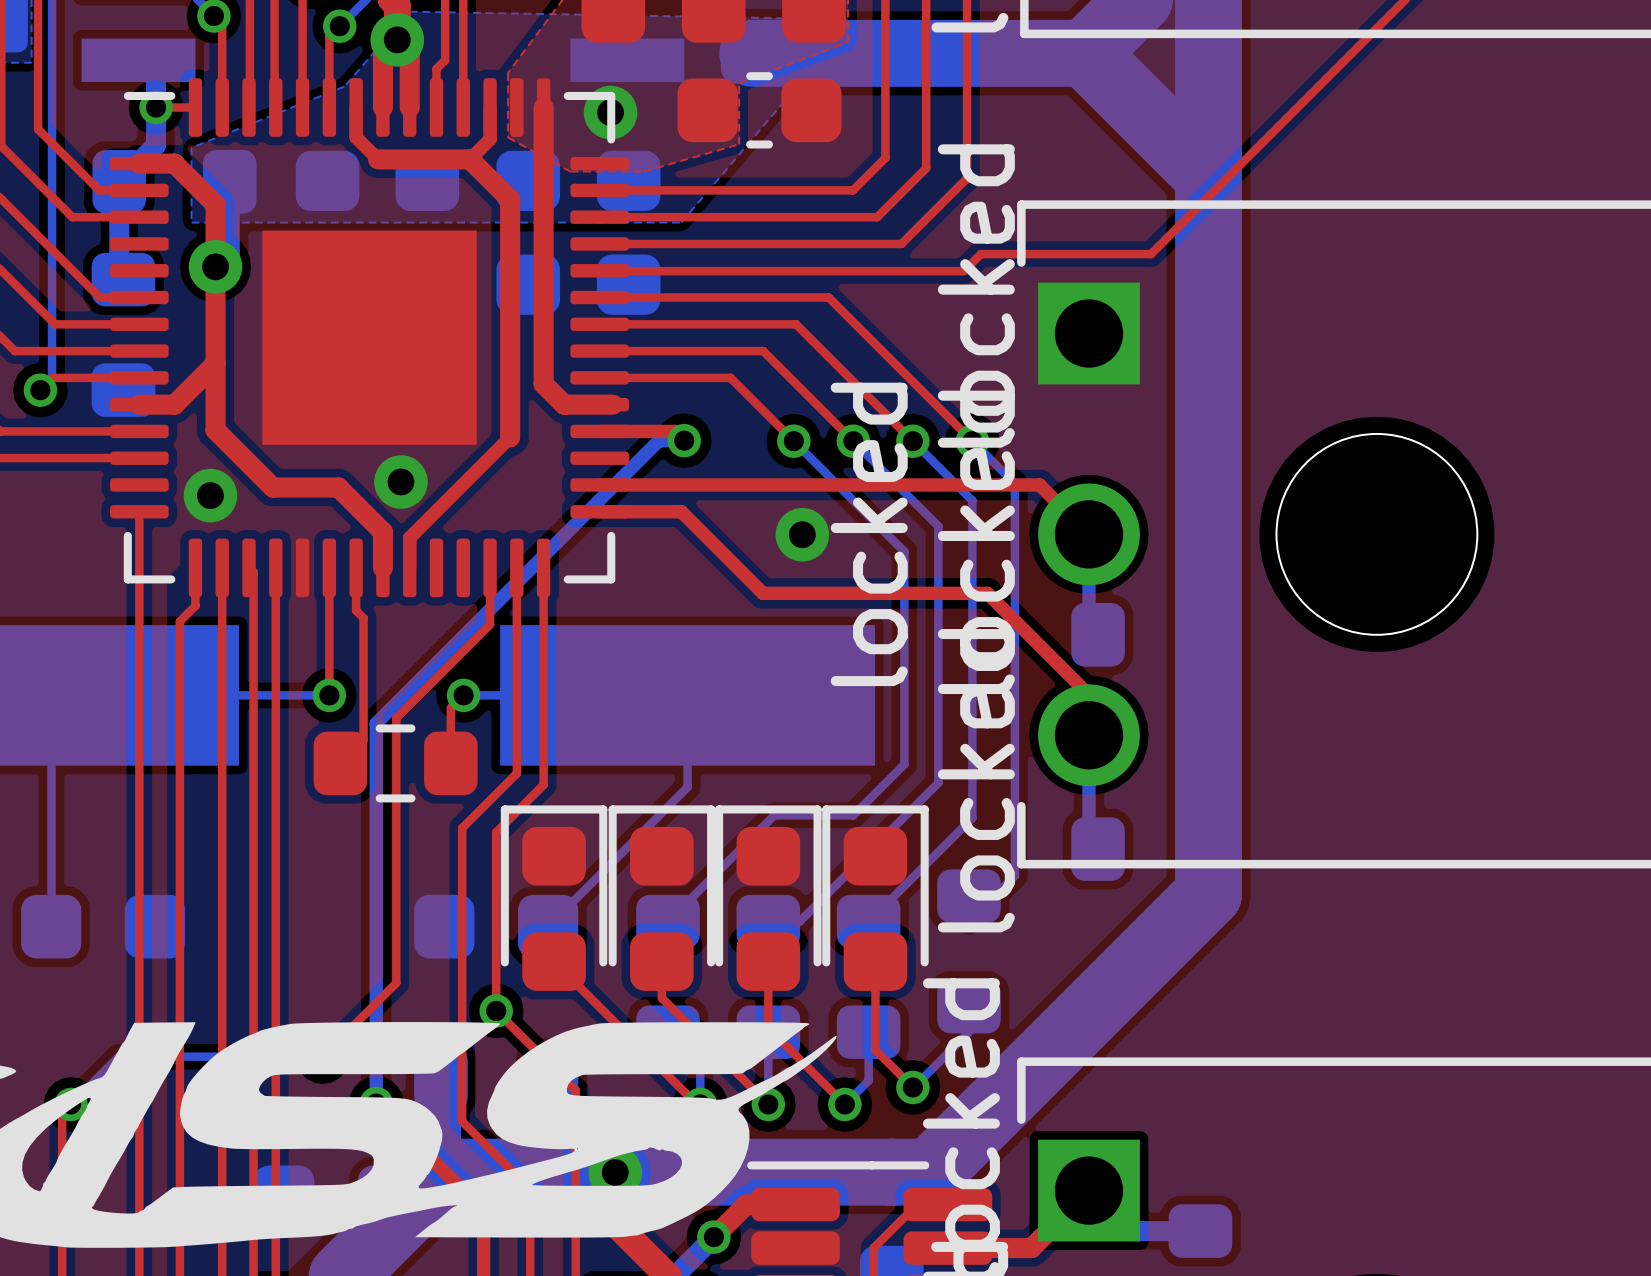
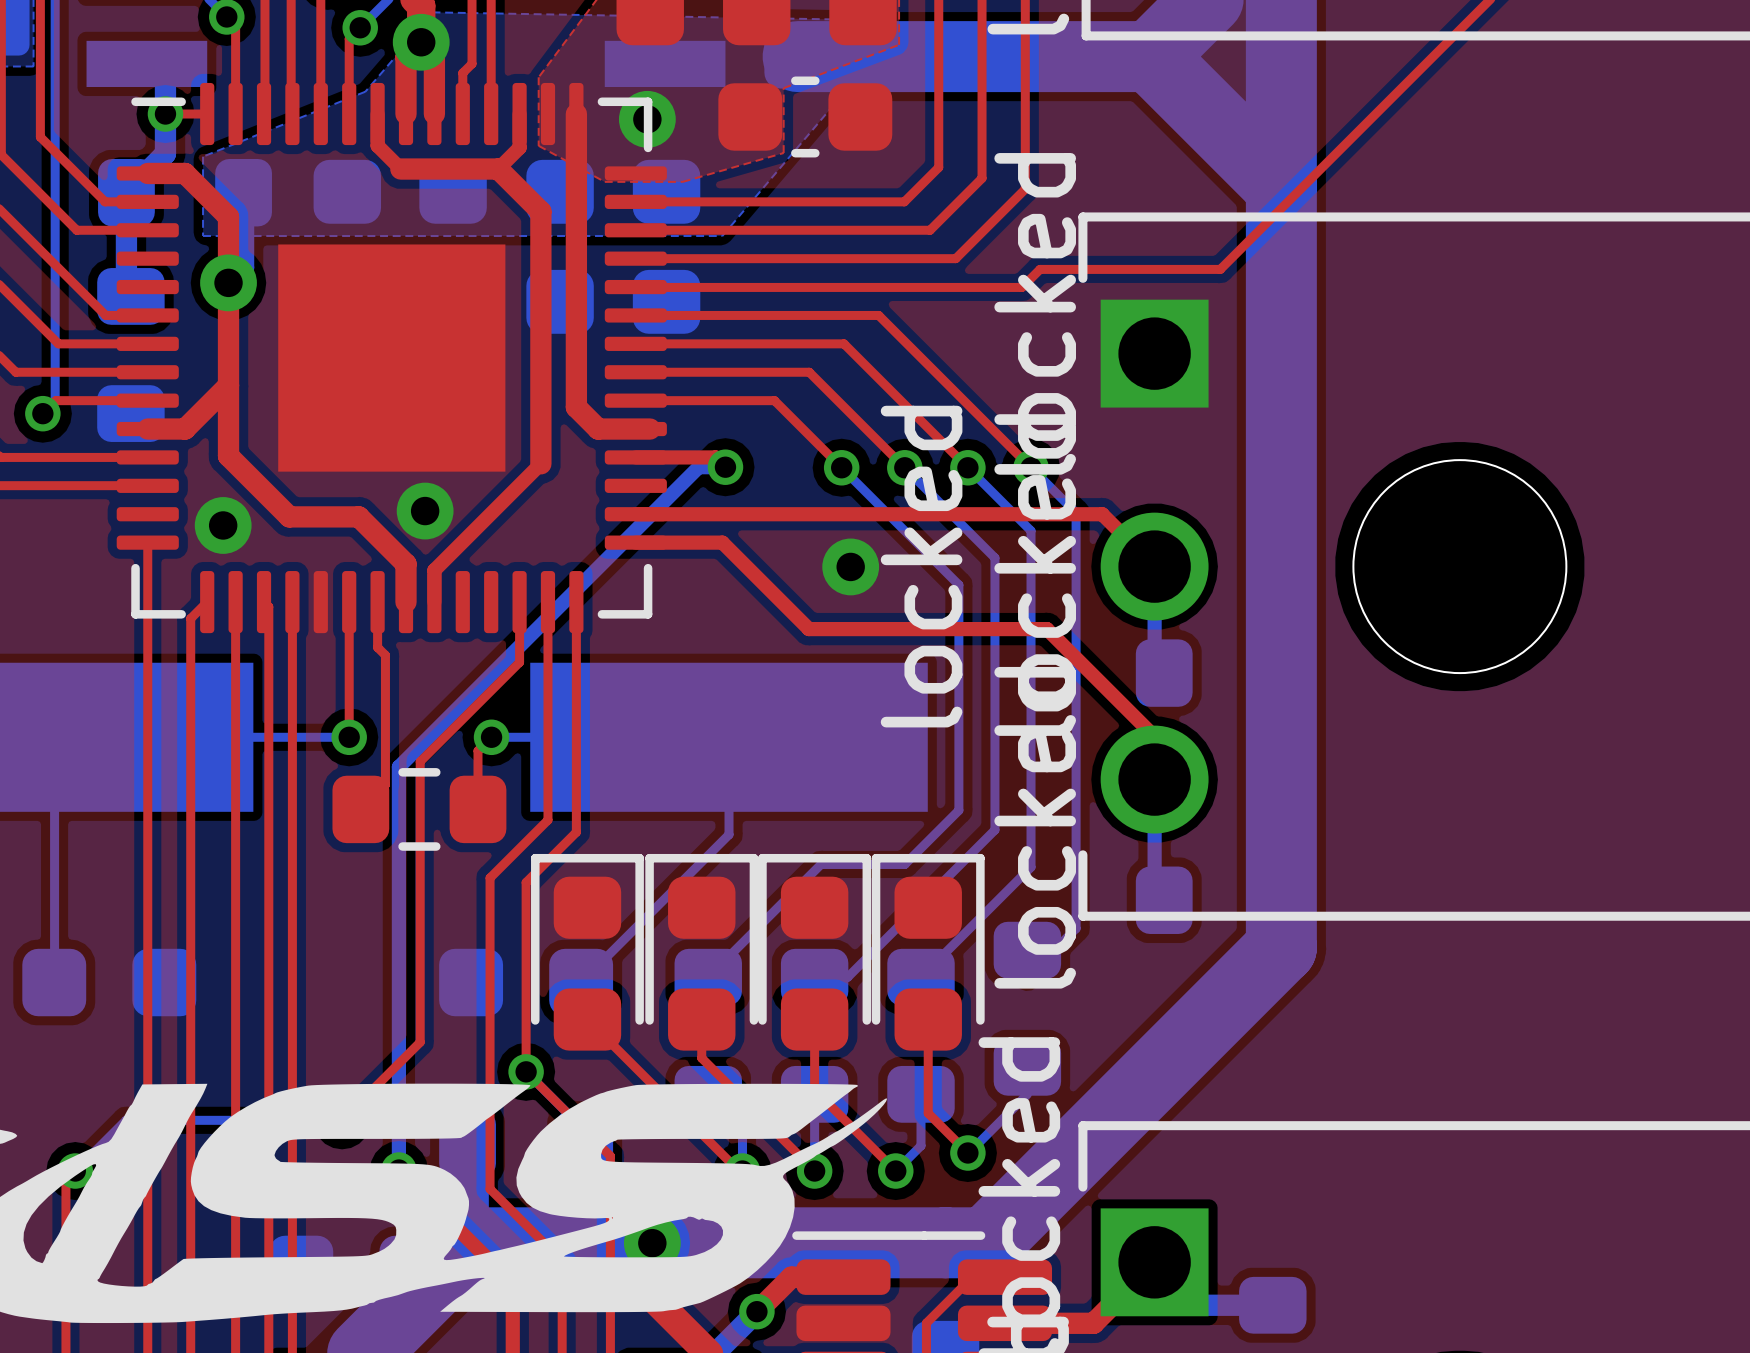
top track: (195, 567) (195, 605) (179, 621) -> (207, 602) (190, 618) (190, 658)

